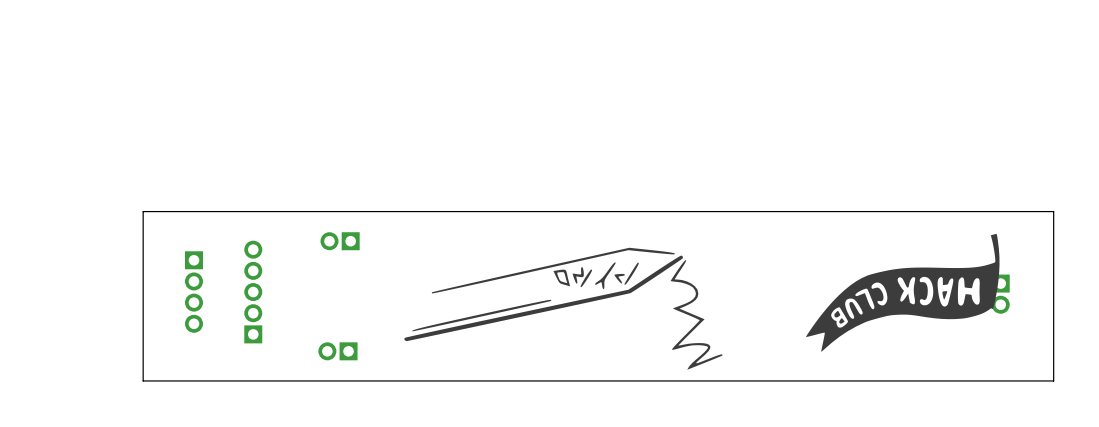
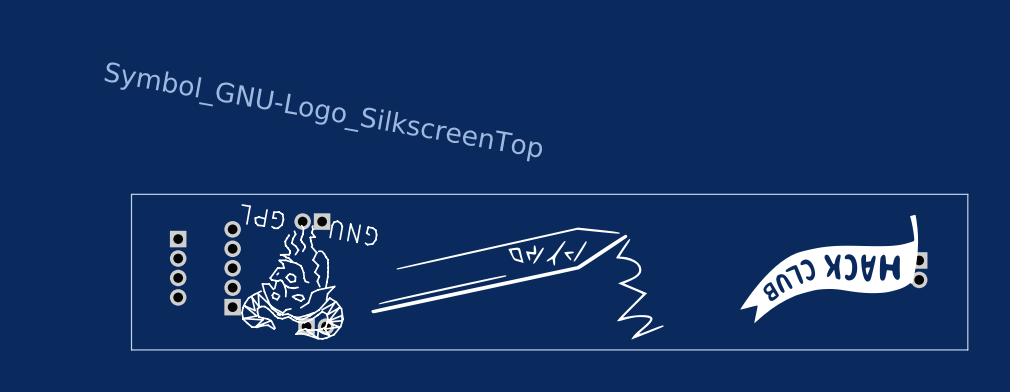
drawing: none -> [241, 204, 378, 340]
part rotation: 0° (337, 351) -> 180° (316, 326)

